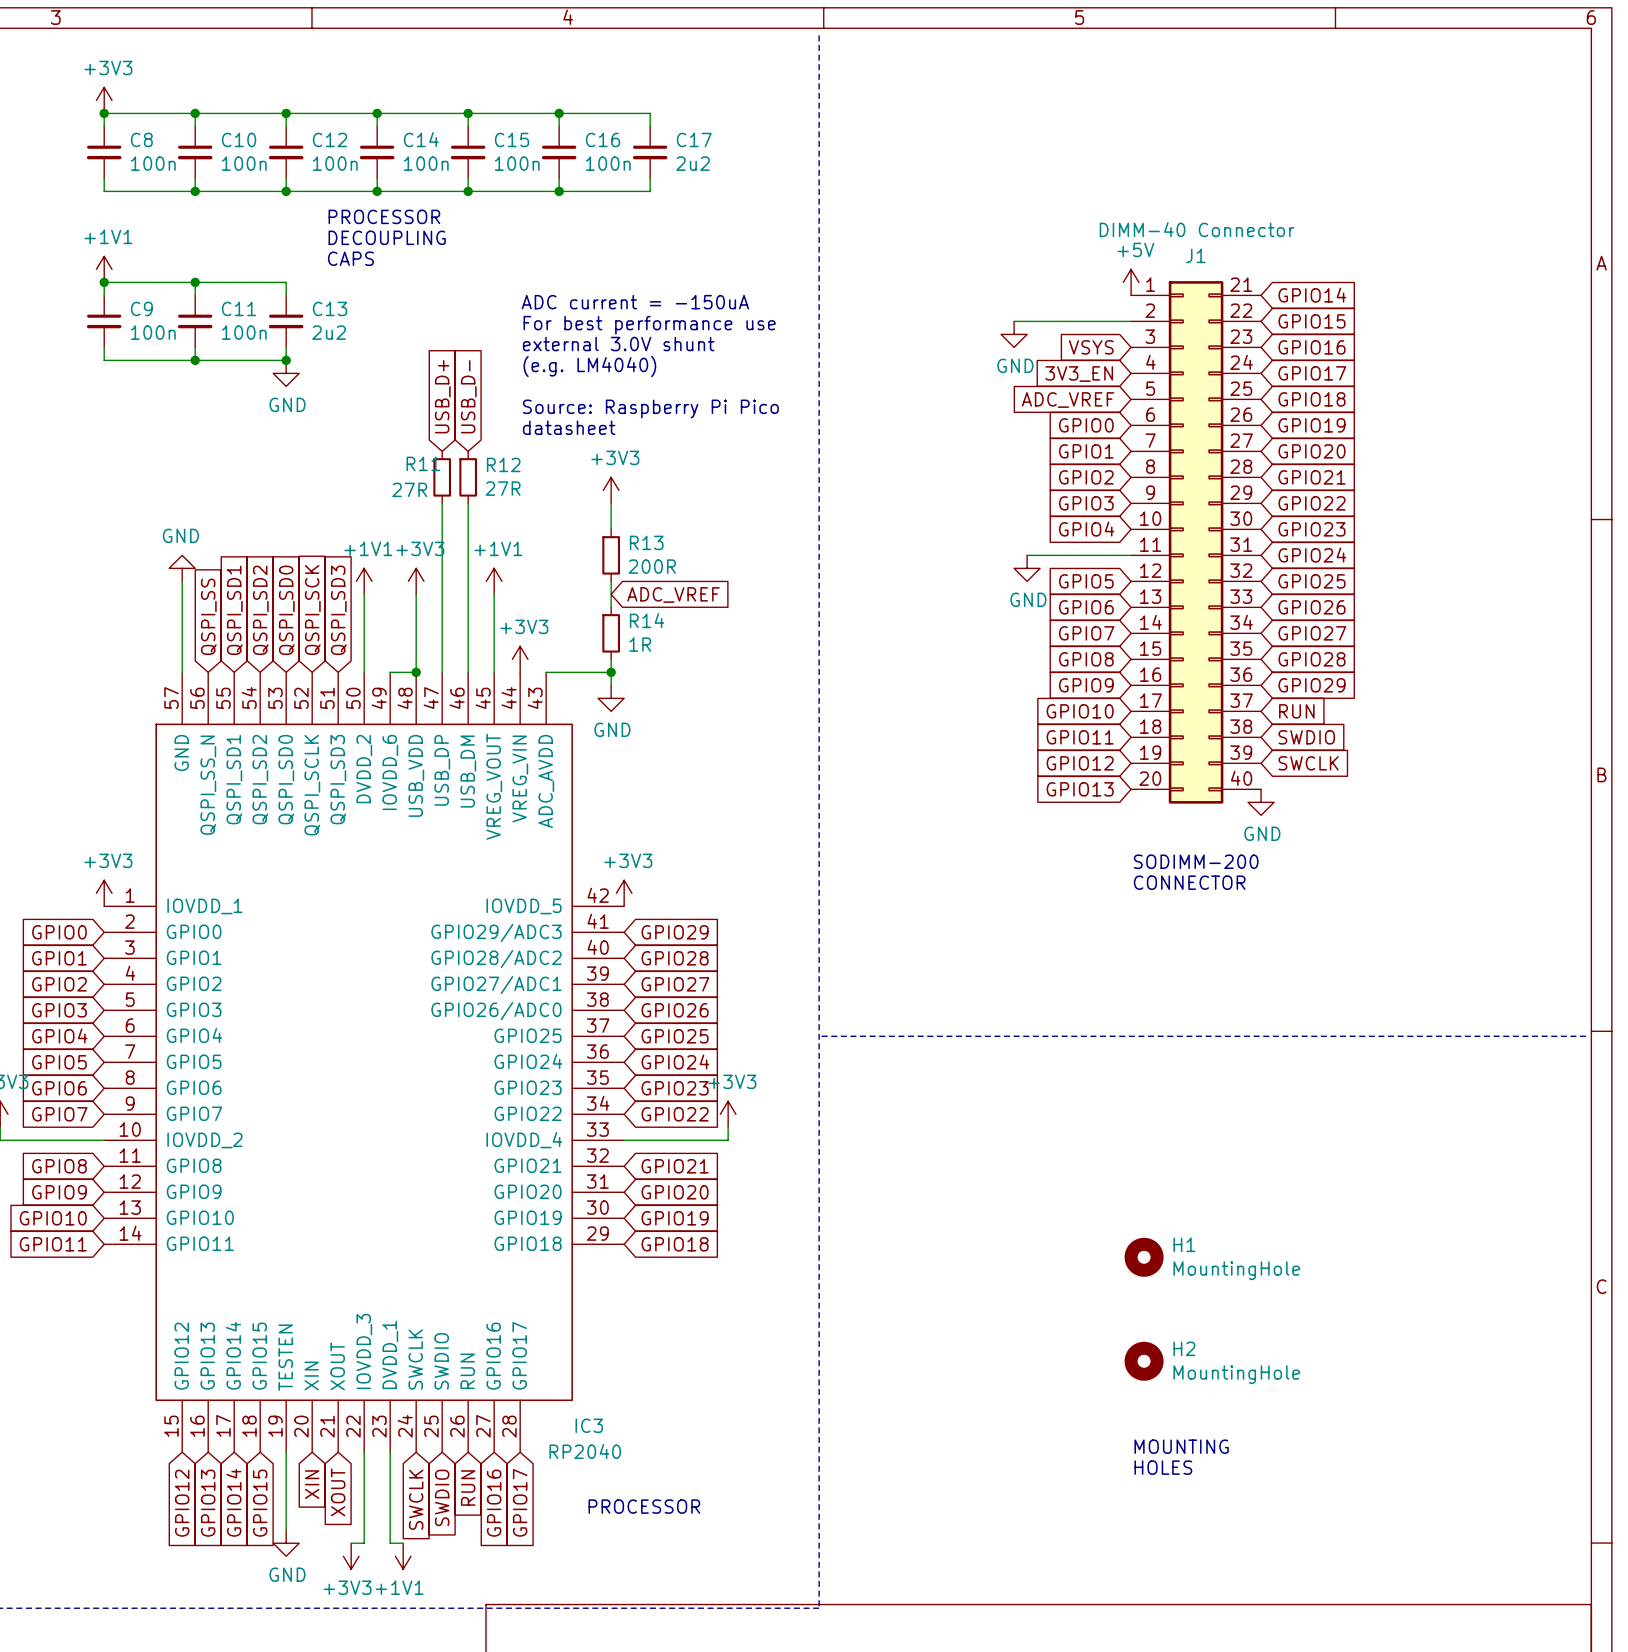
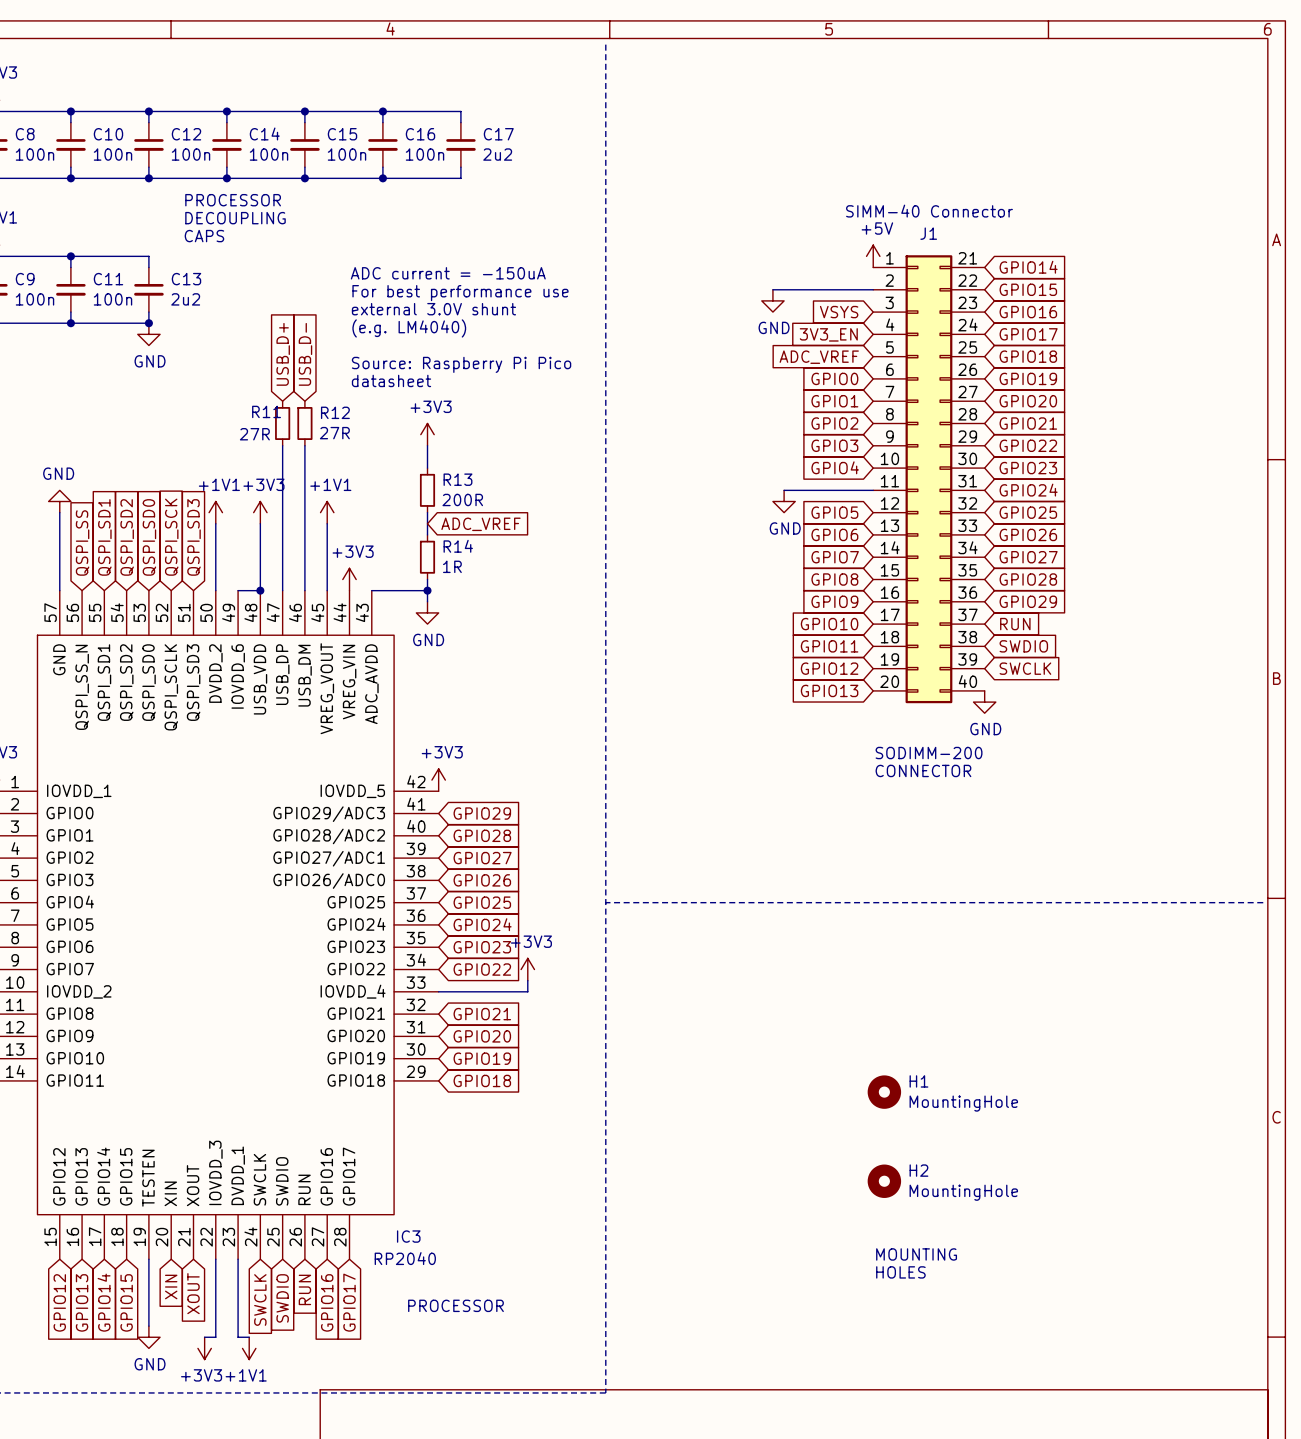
J1 value: DIMM-40 Connector (1197, 229) -> SIMM-40 Connector (929, 211)

